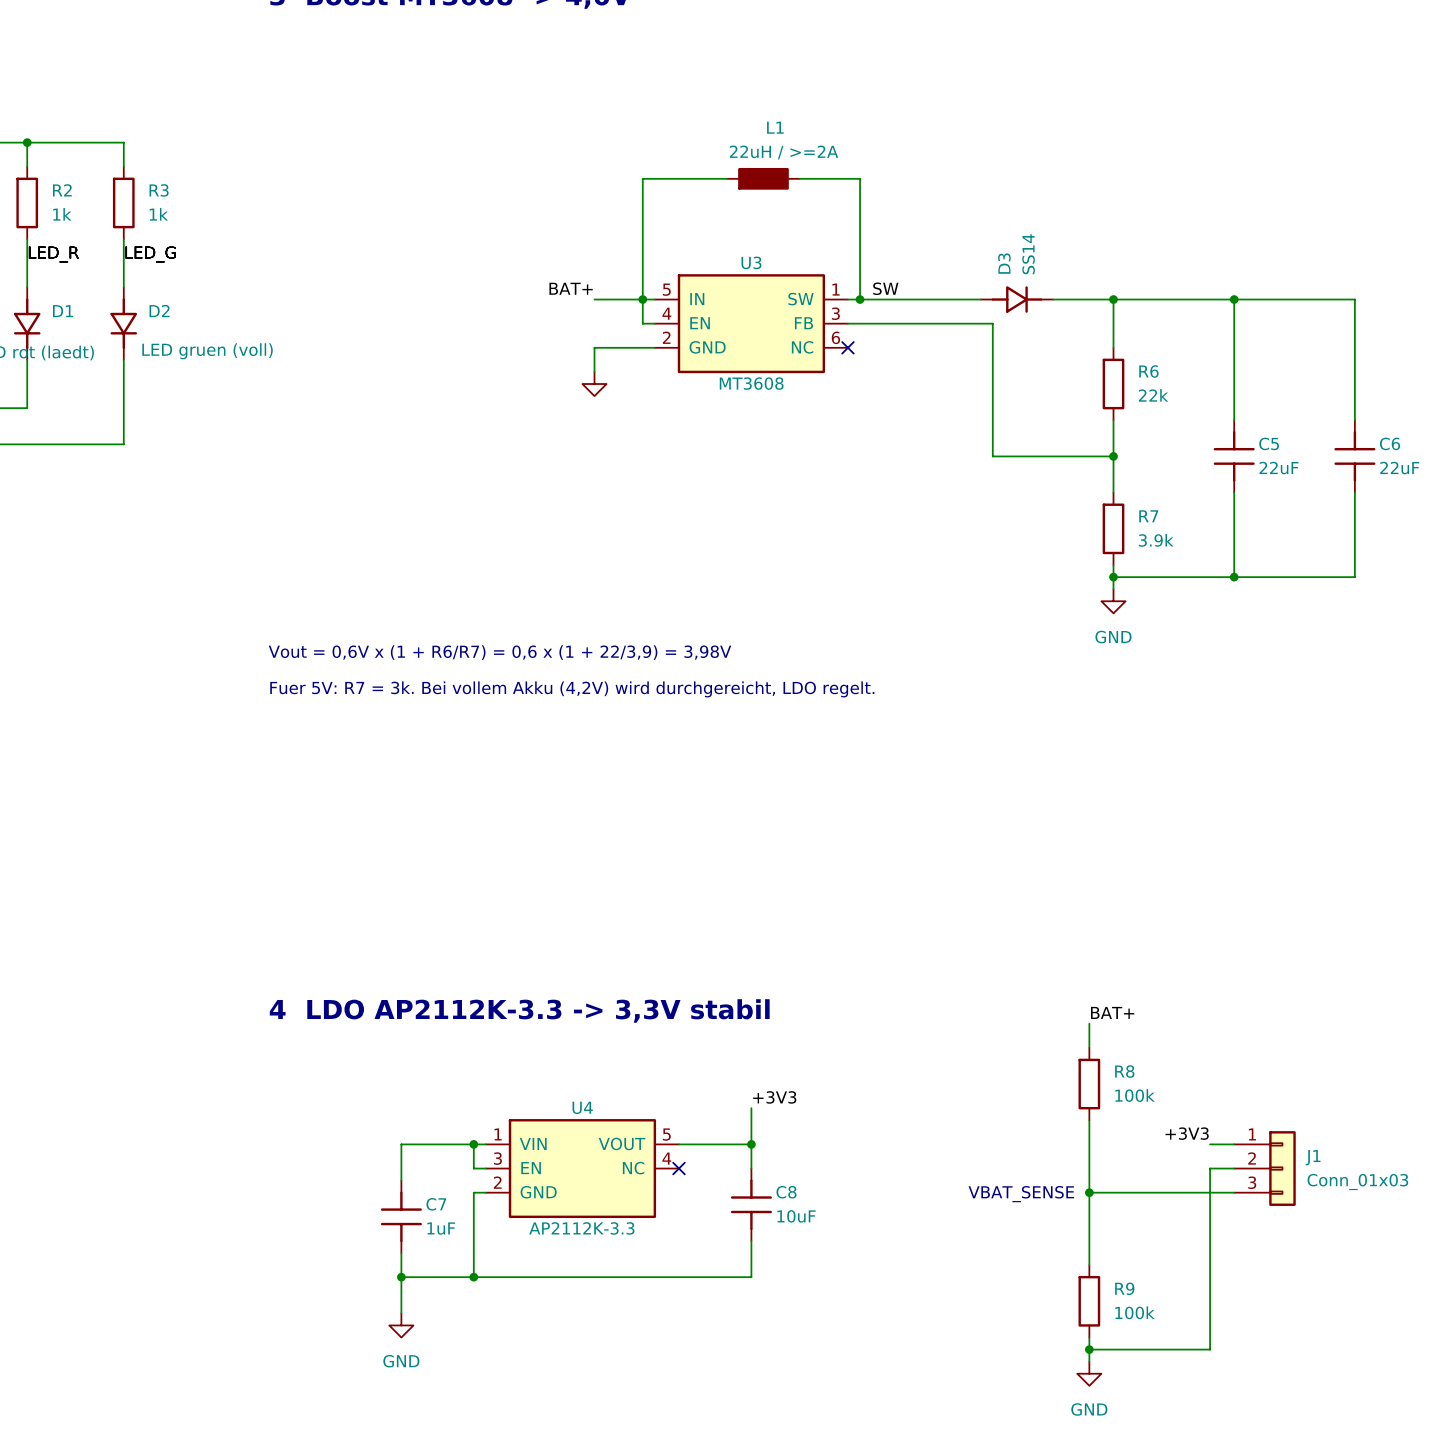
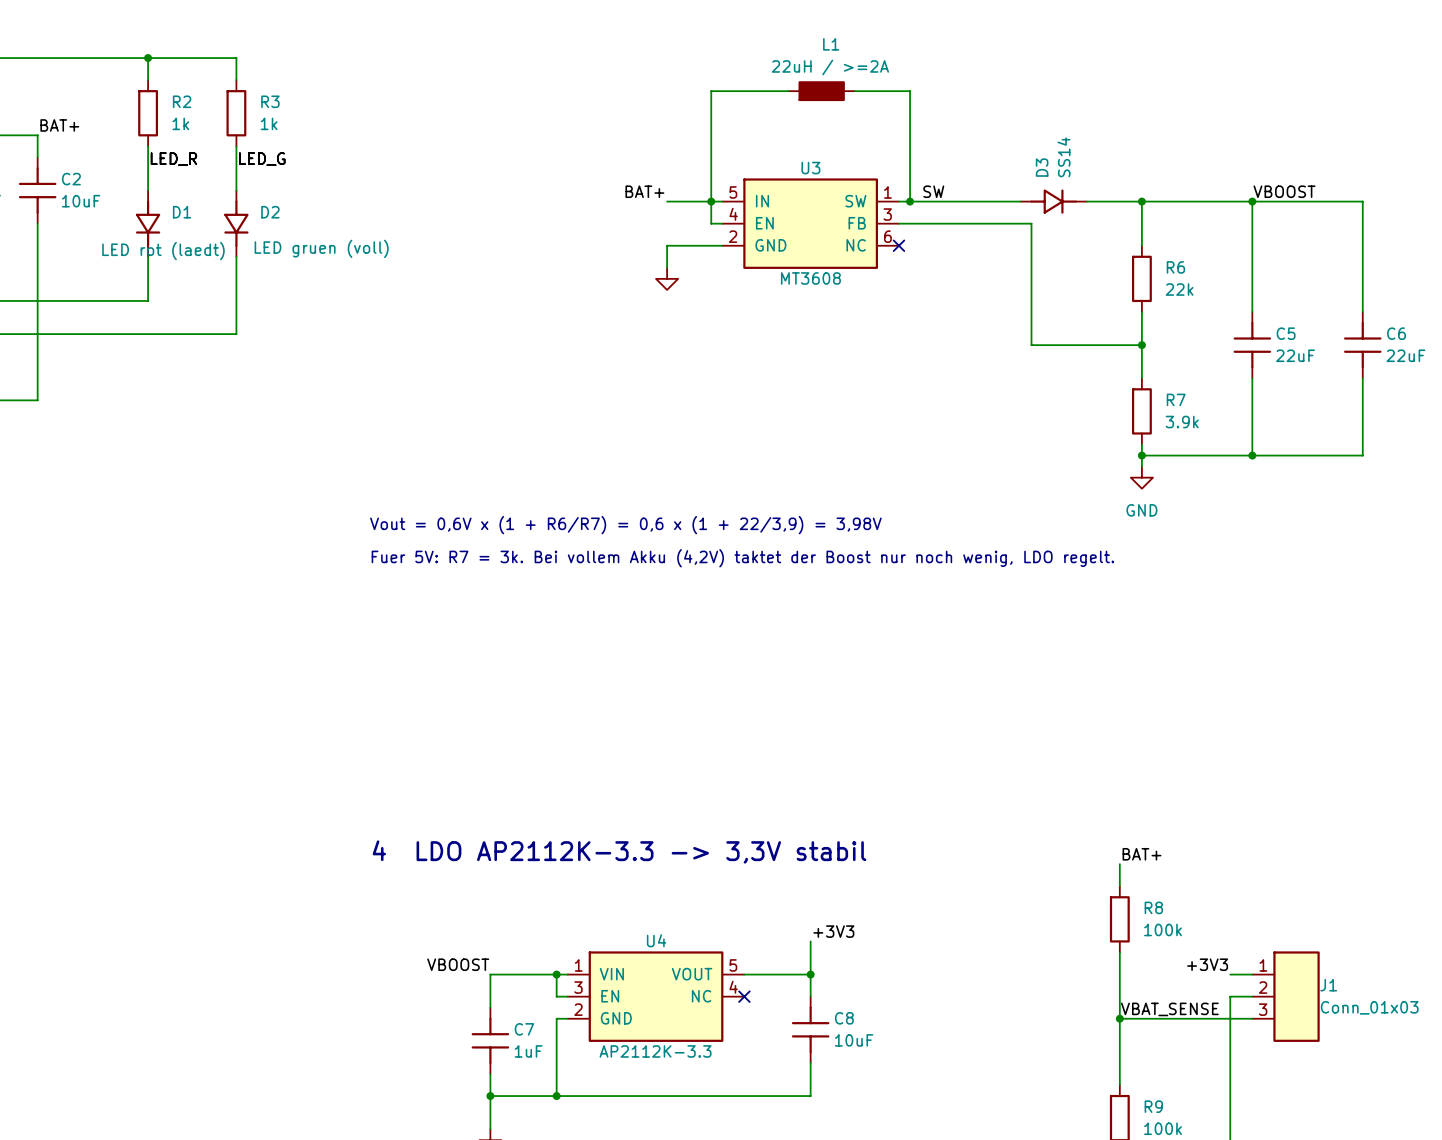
label: none -> VBOOST (1284, 191)
text: Fuer 5V: R7 = 3k. Bei vollem Akku (4,2V) wird durchgereicht, LDO regelt. (572, 689) -> Fuer 5V: R7 = 3k. Bei vollem Akku (4,2V) taktet der Boost nur noch wenig, LDO regelt. (742, 558)
J1 symbol: [1234, 1131, 1296, 1206] -> [1252, 951, 1320, 1042]
label: none -> VBOOST (458, 964)
label: none -> VBAT_SENSE (1169, 1009)
text: VBAT_SENSE (1021, 1194) -> none

